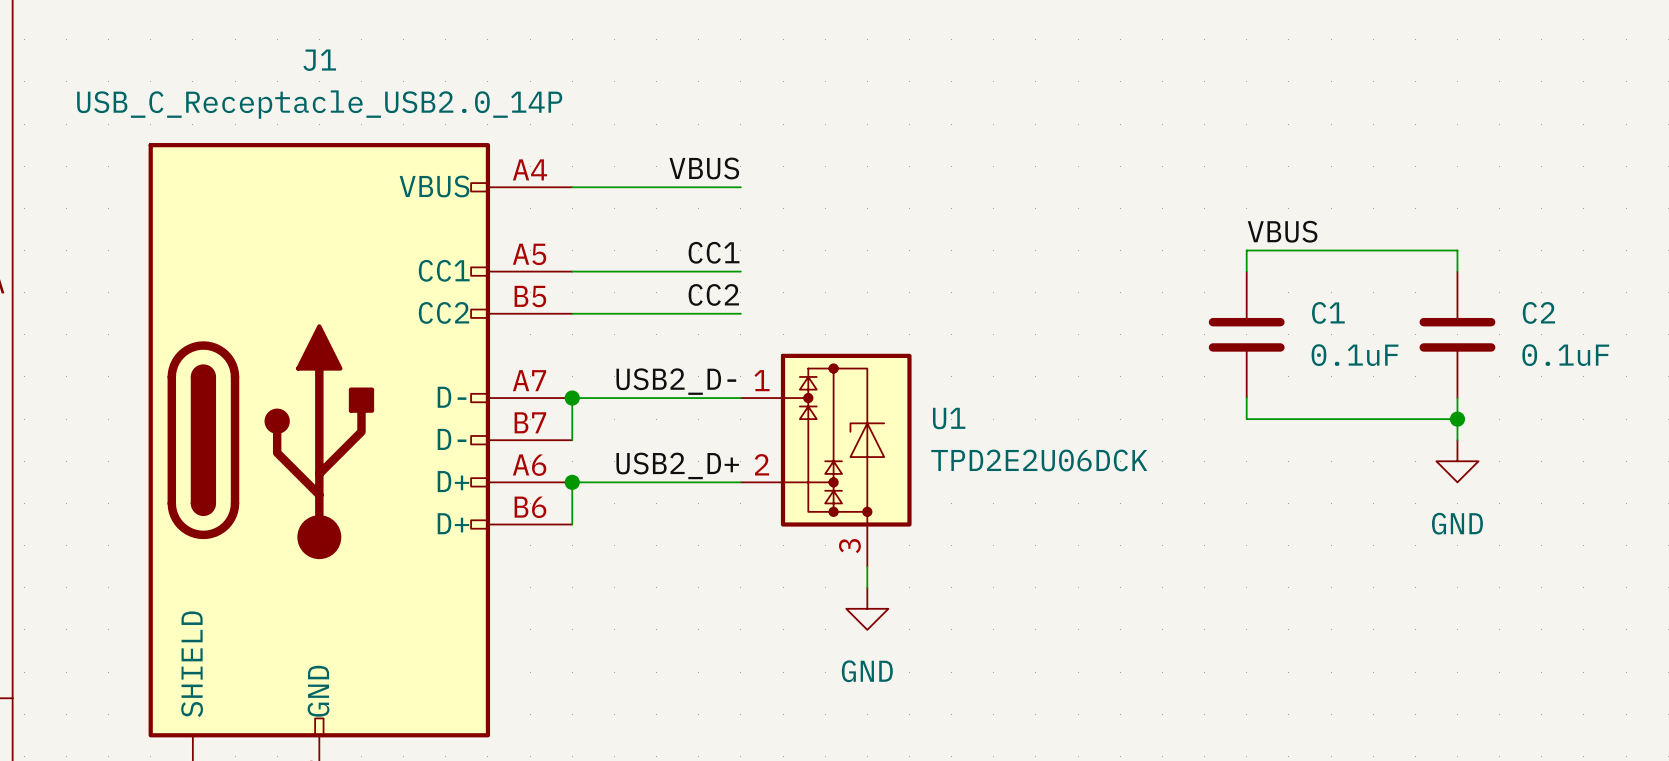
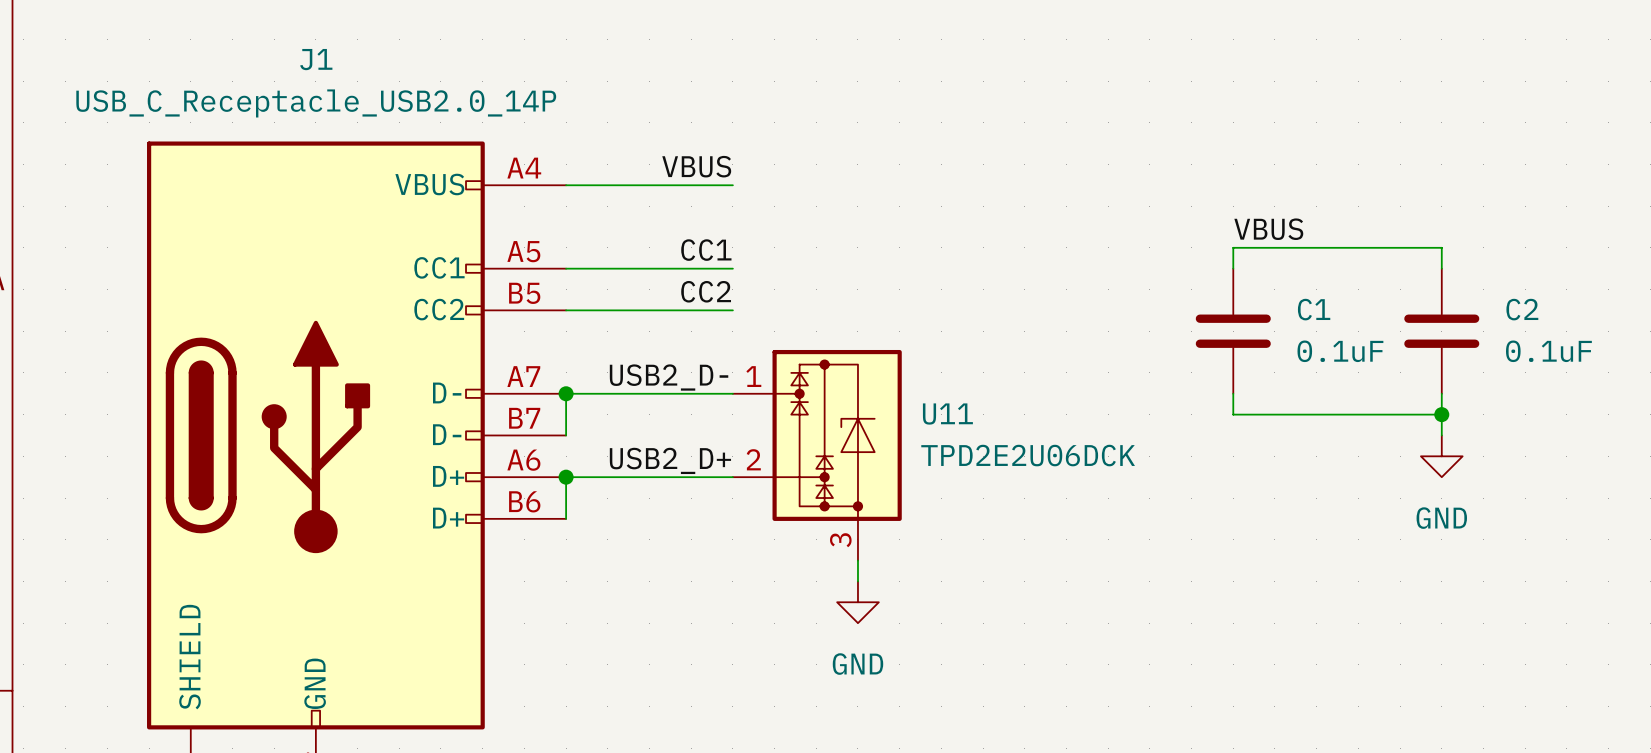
U1 name: U1 (949, 418) -> U11 (947, 414)

